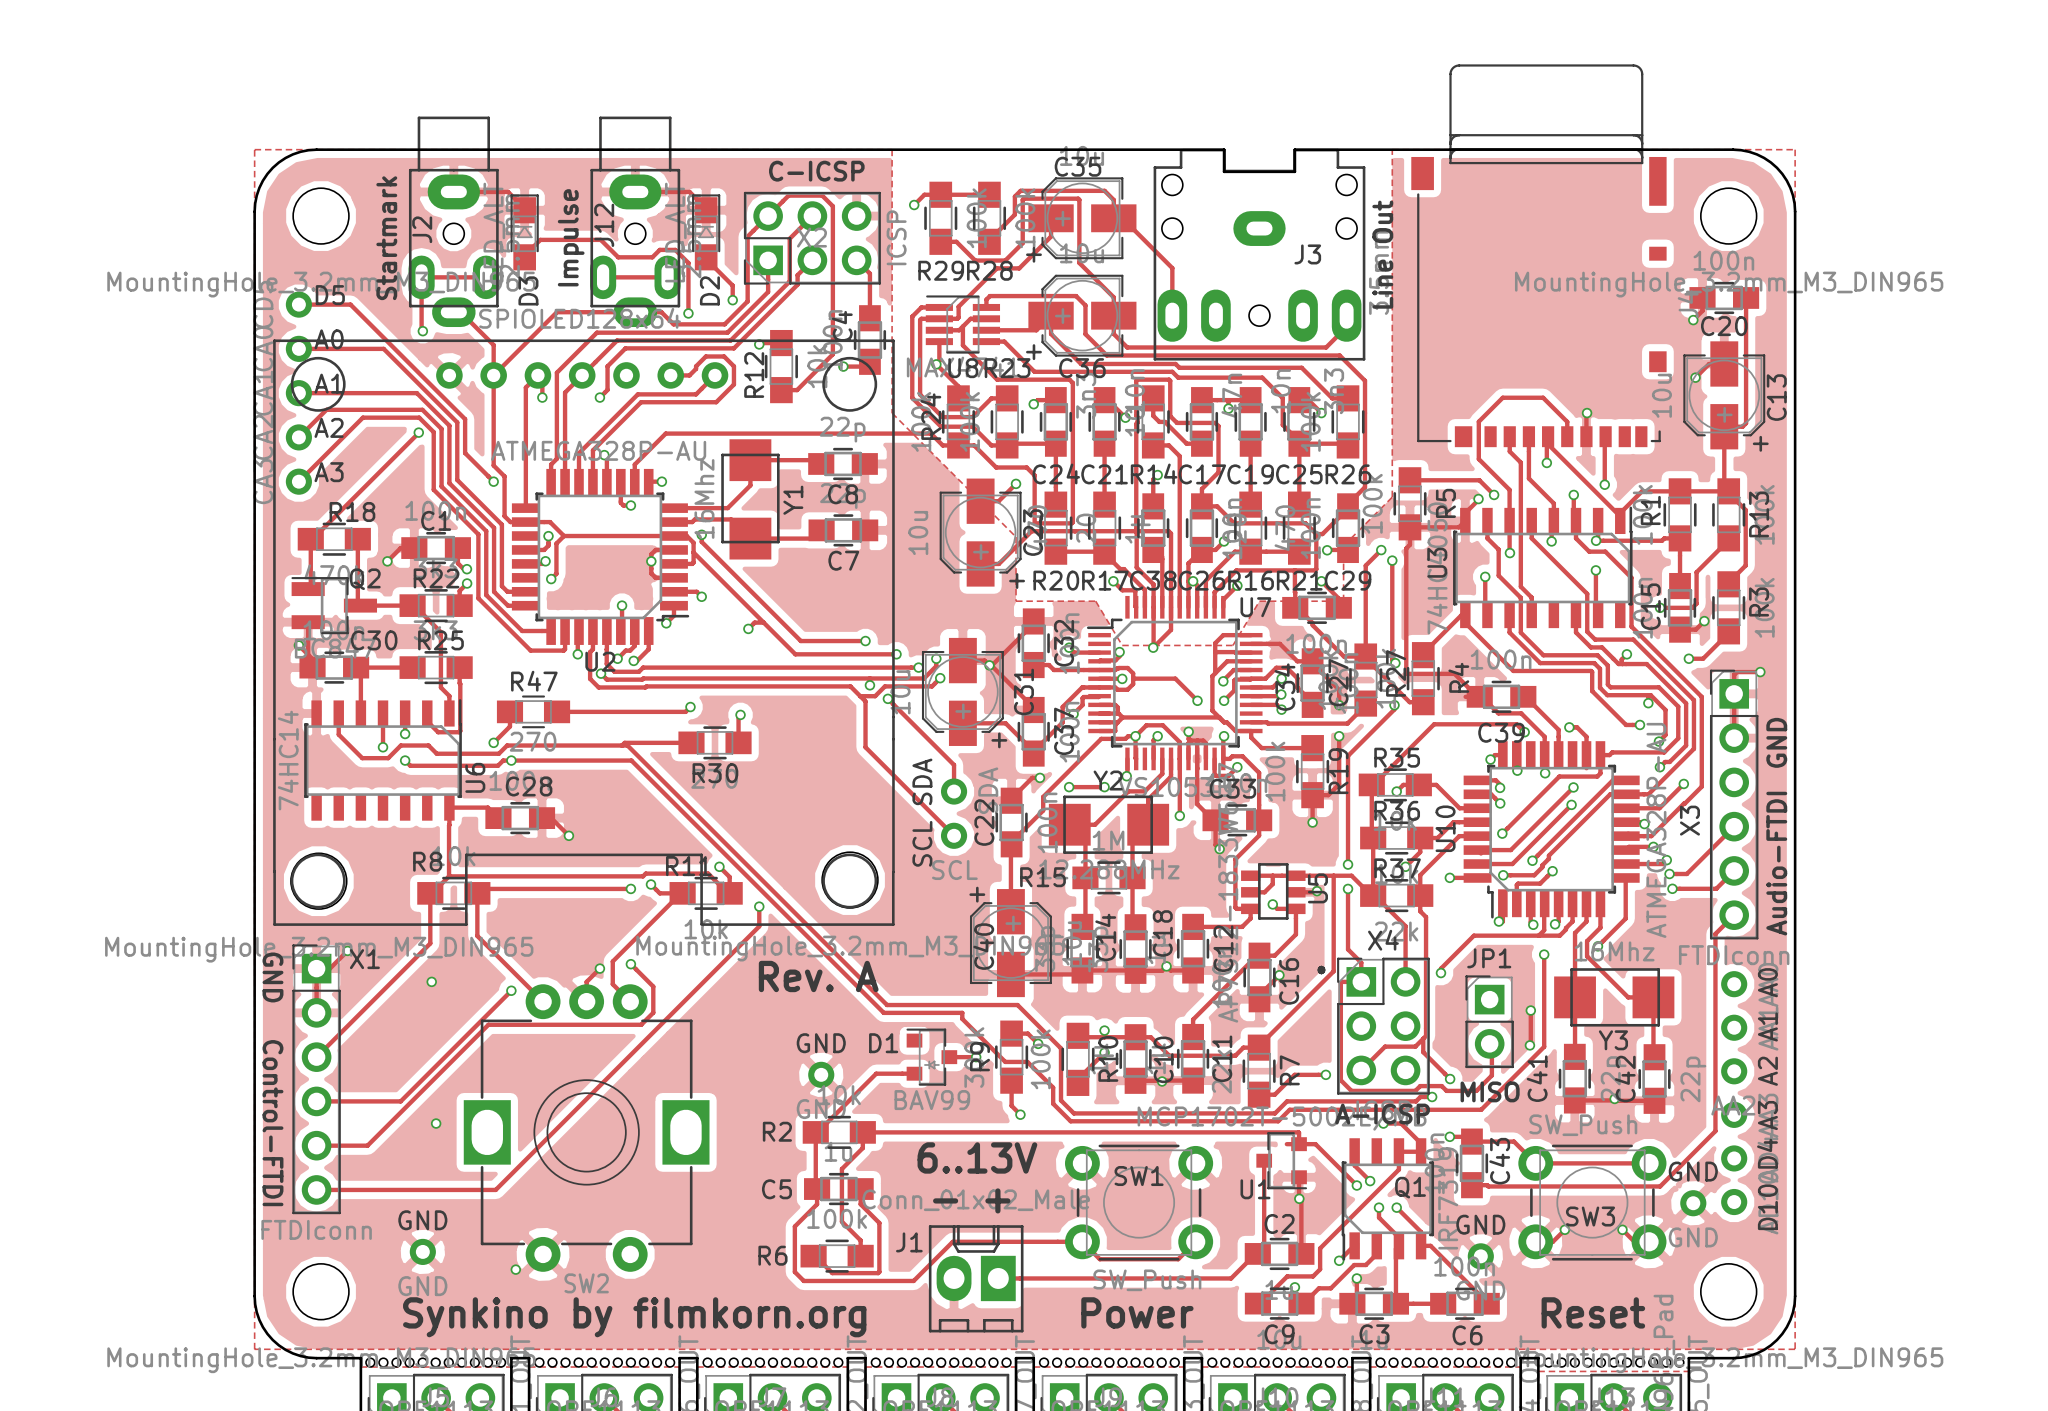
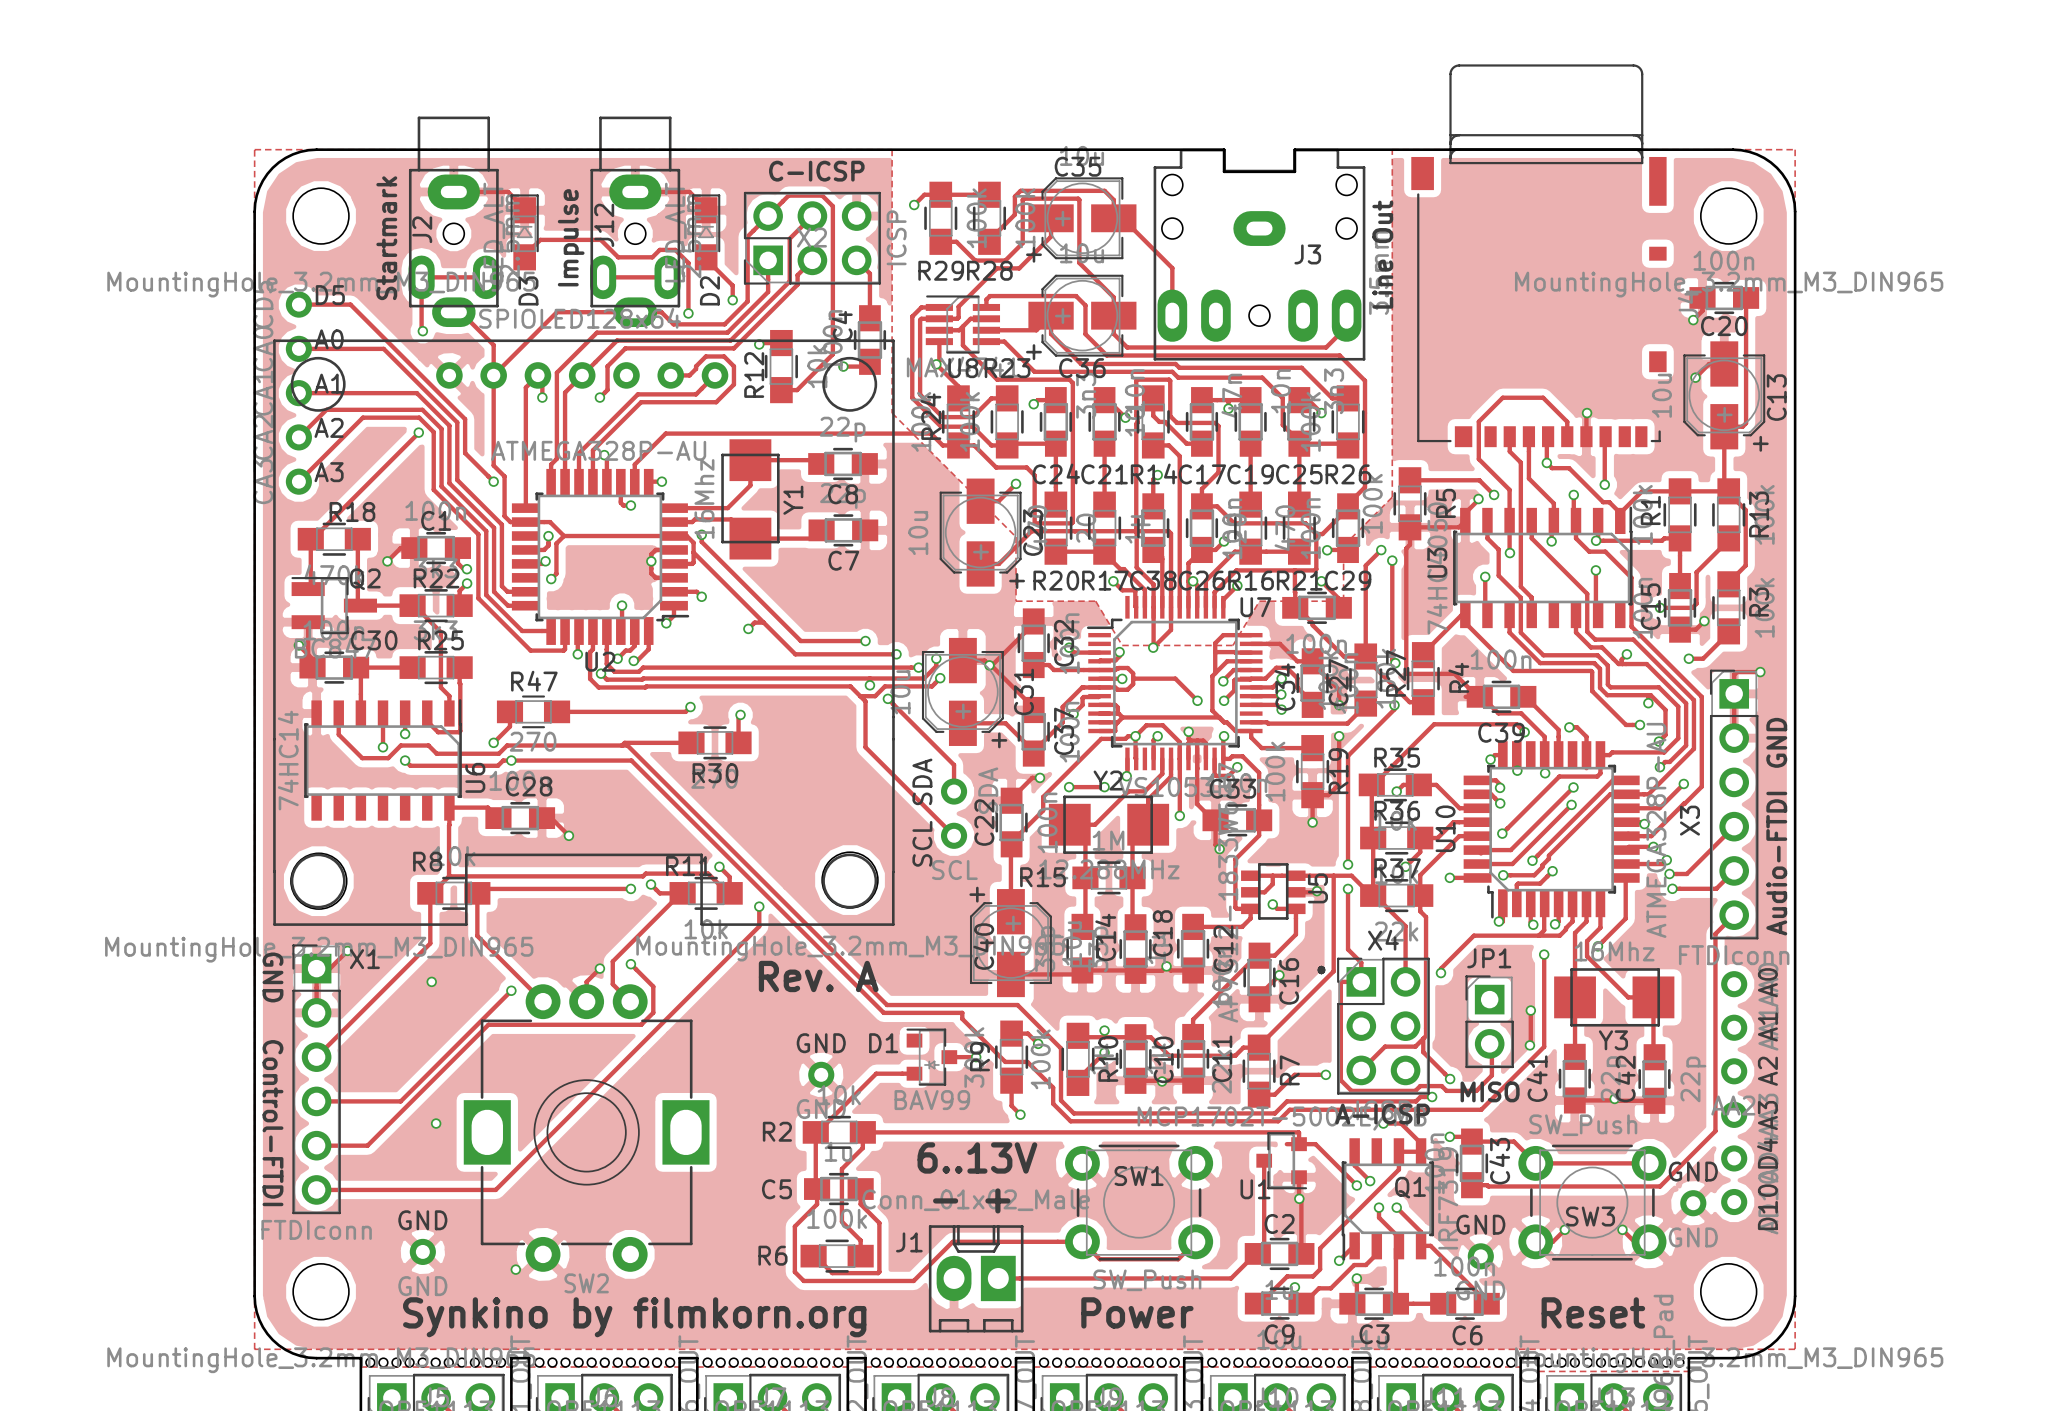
track: (1548, 444) (1620, 516) -> none
track: none -> (1546, 462) (1552, 468) (1569, 468) (1603, 502) (1609, 502) (1620, 513)

